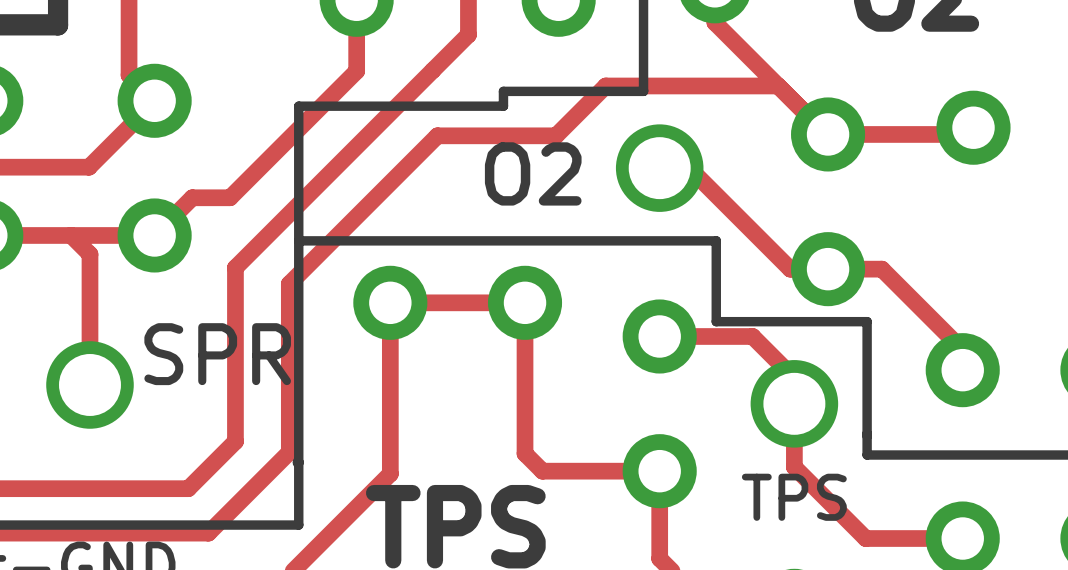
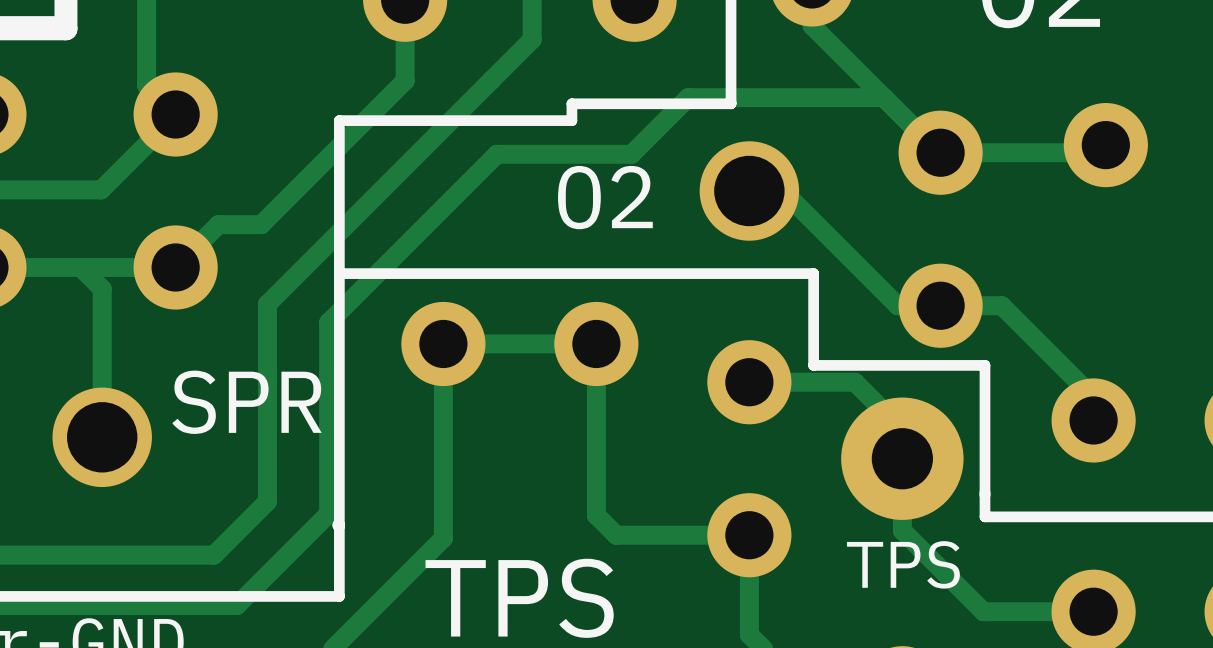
part footprint: [750, 360, 839, 448] -> [841, 397, 964, 520]

